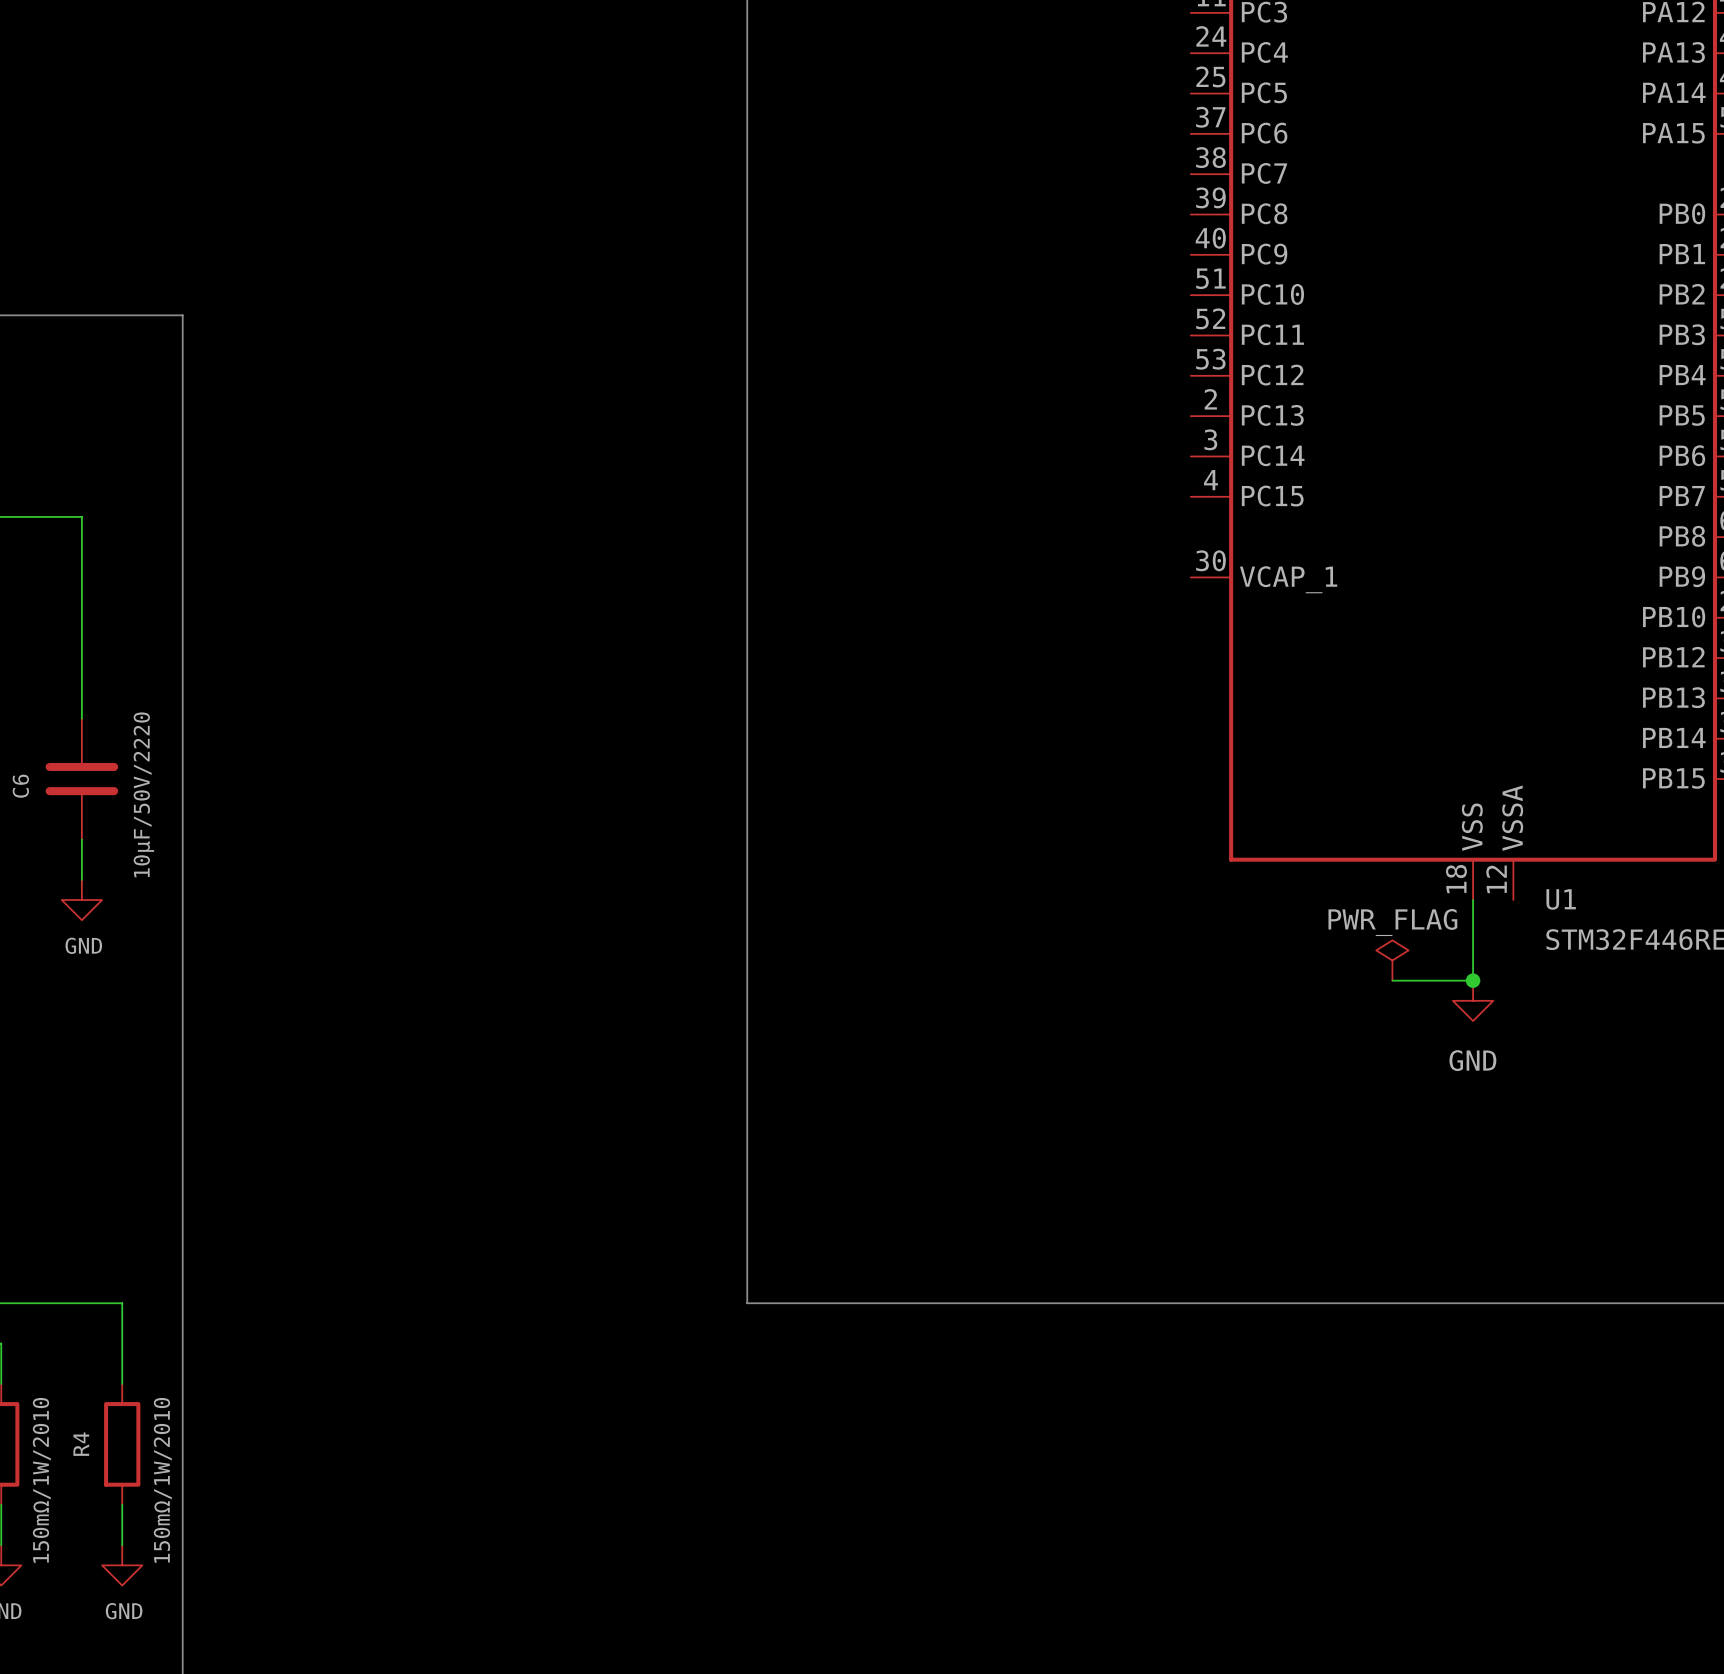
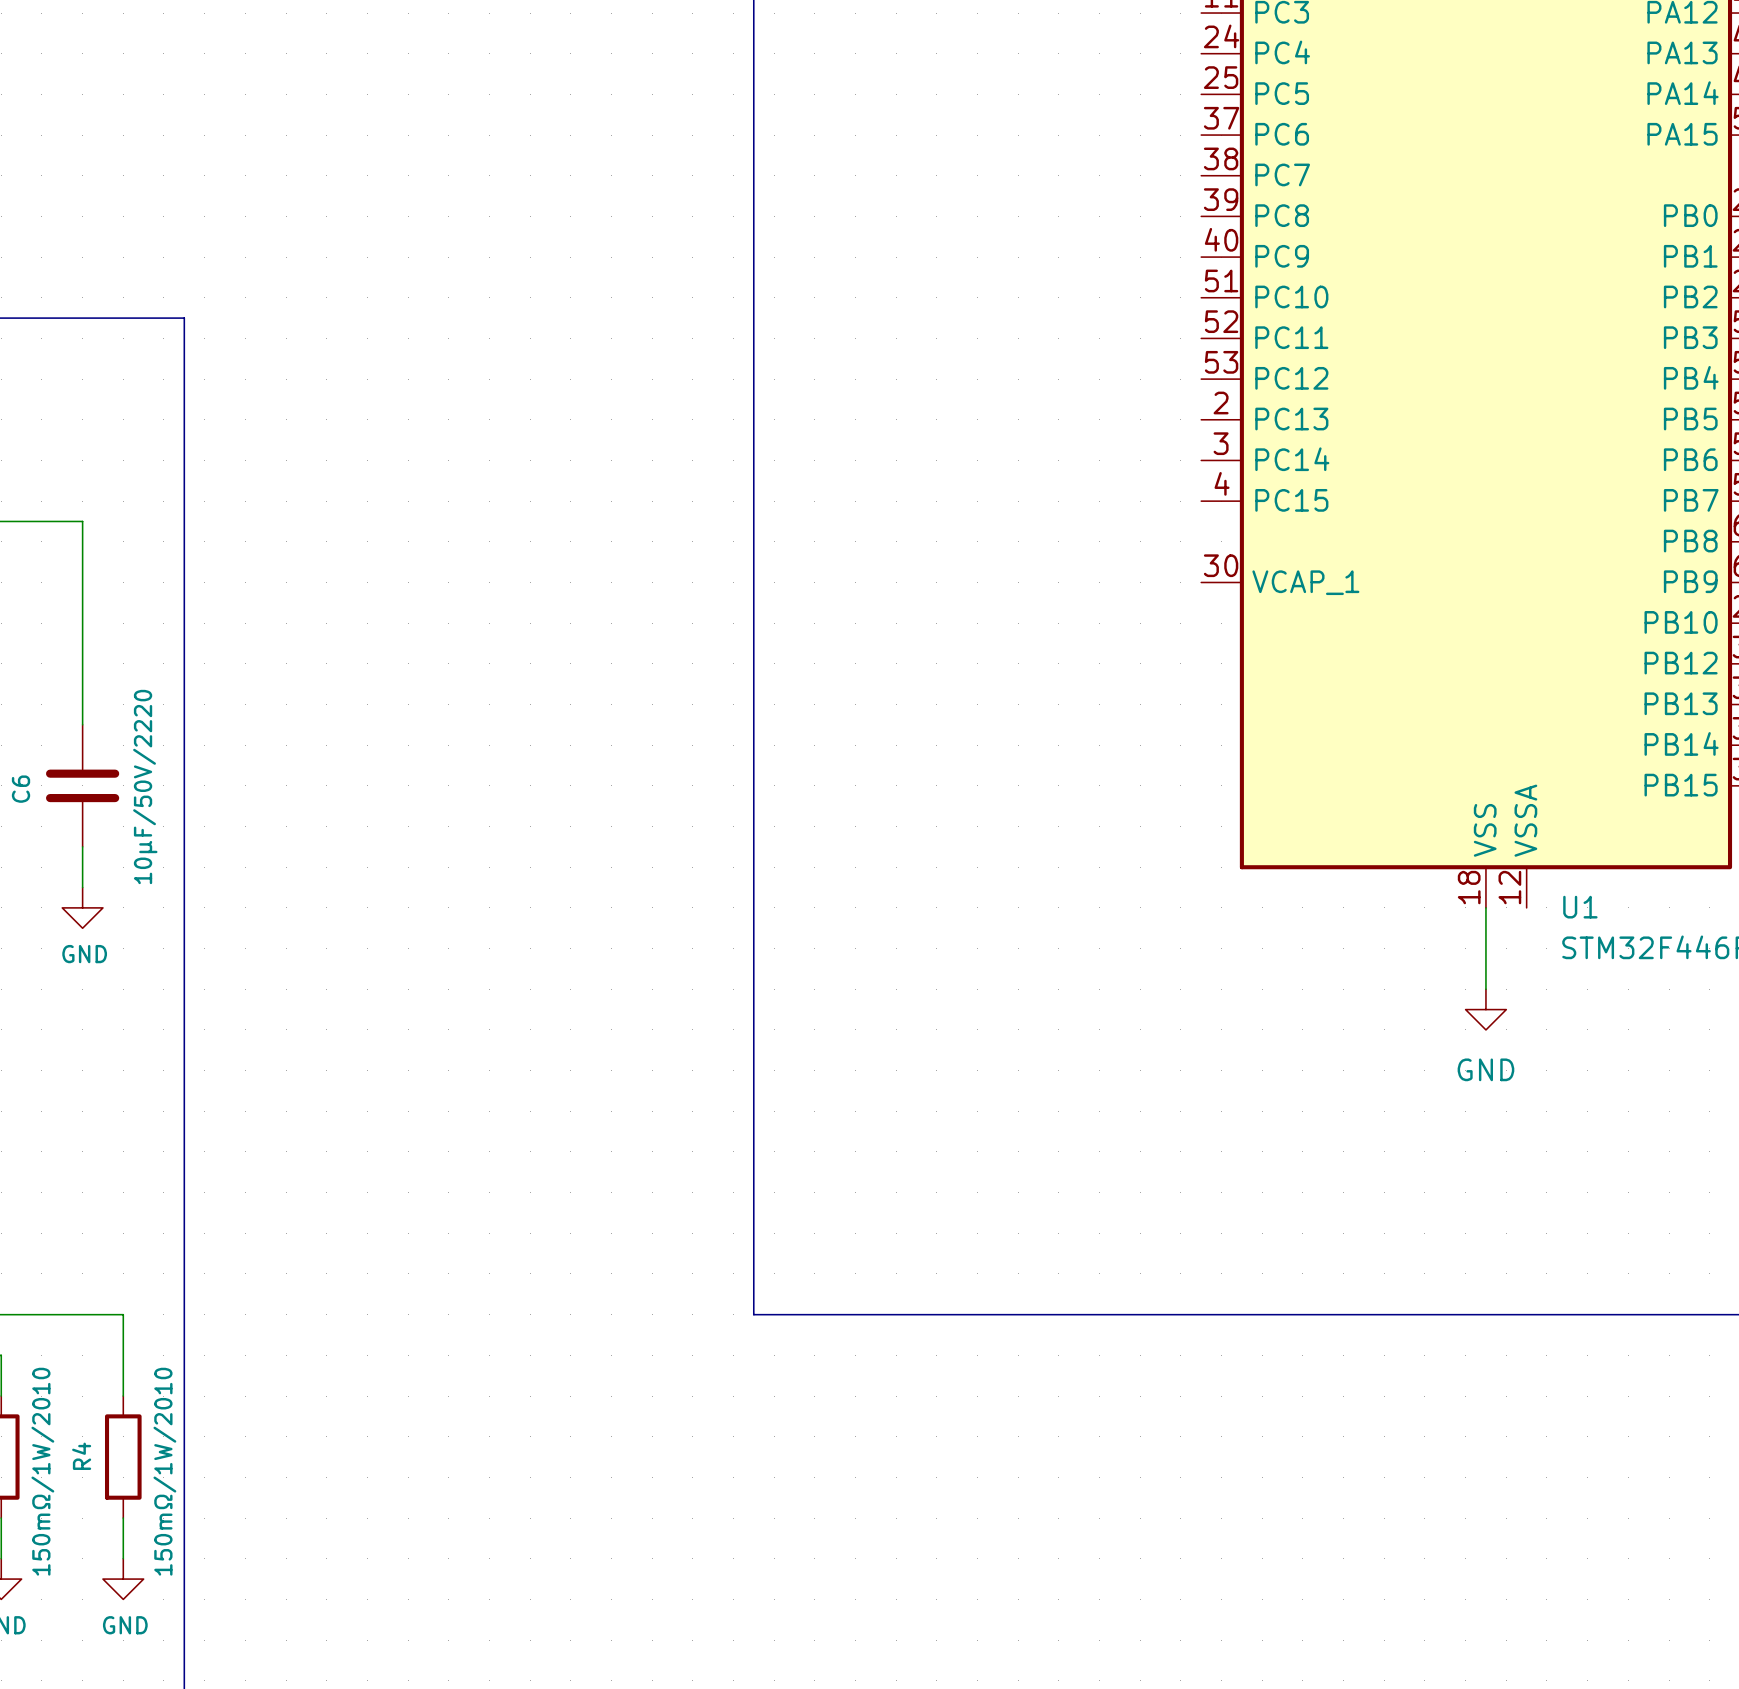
power symbol: PWR_FLAG (1392, 960) -> none
wire: (1392, 980) (1473, 980) -> none
junction: (1473, 980) -> none

